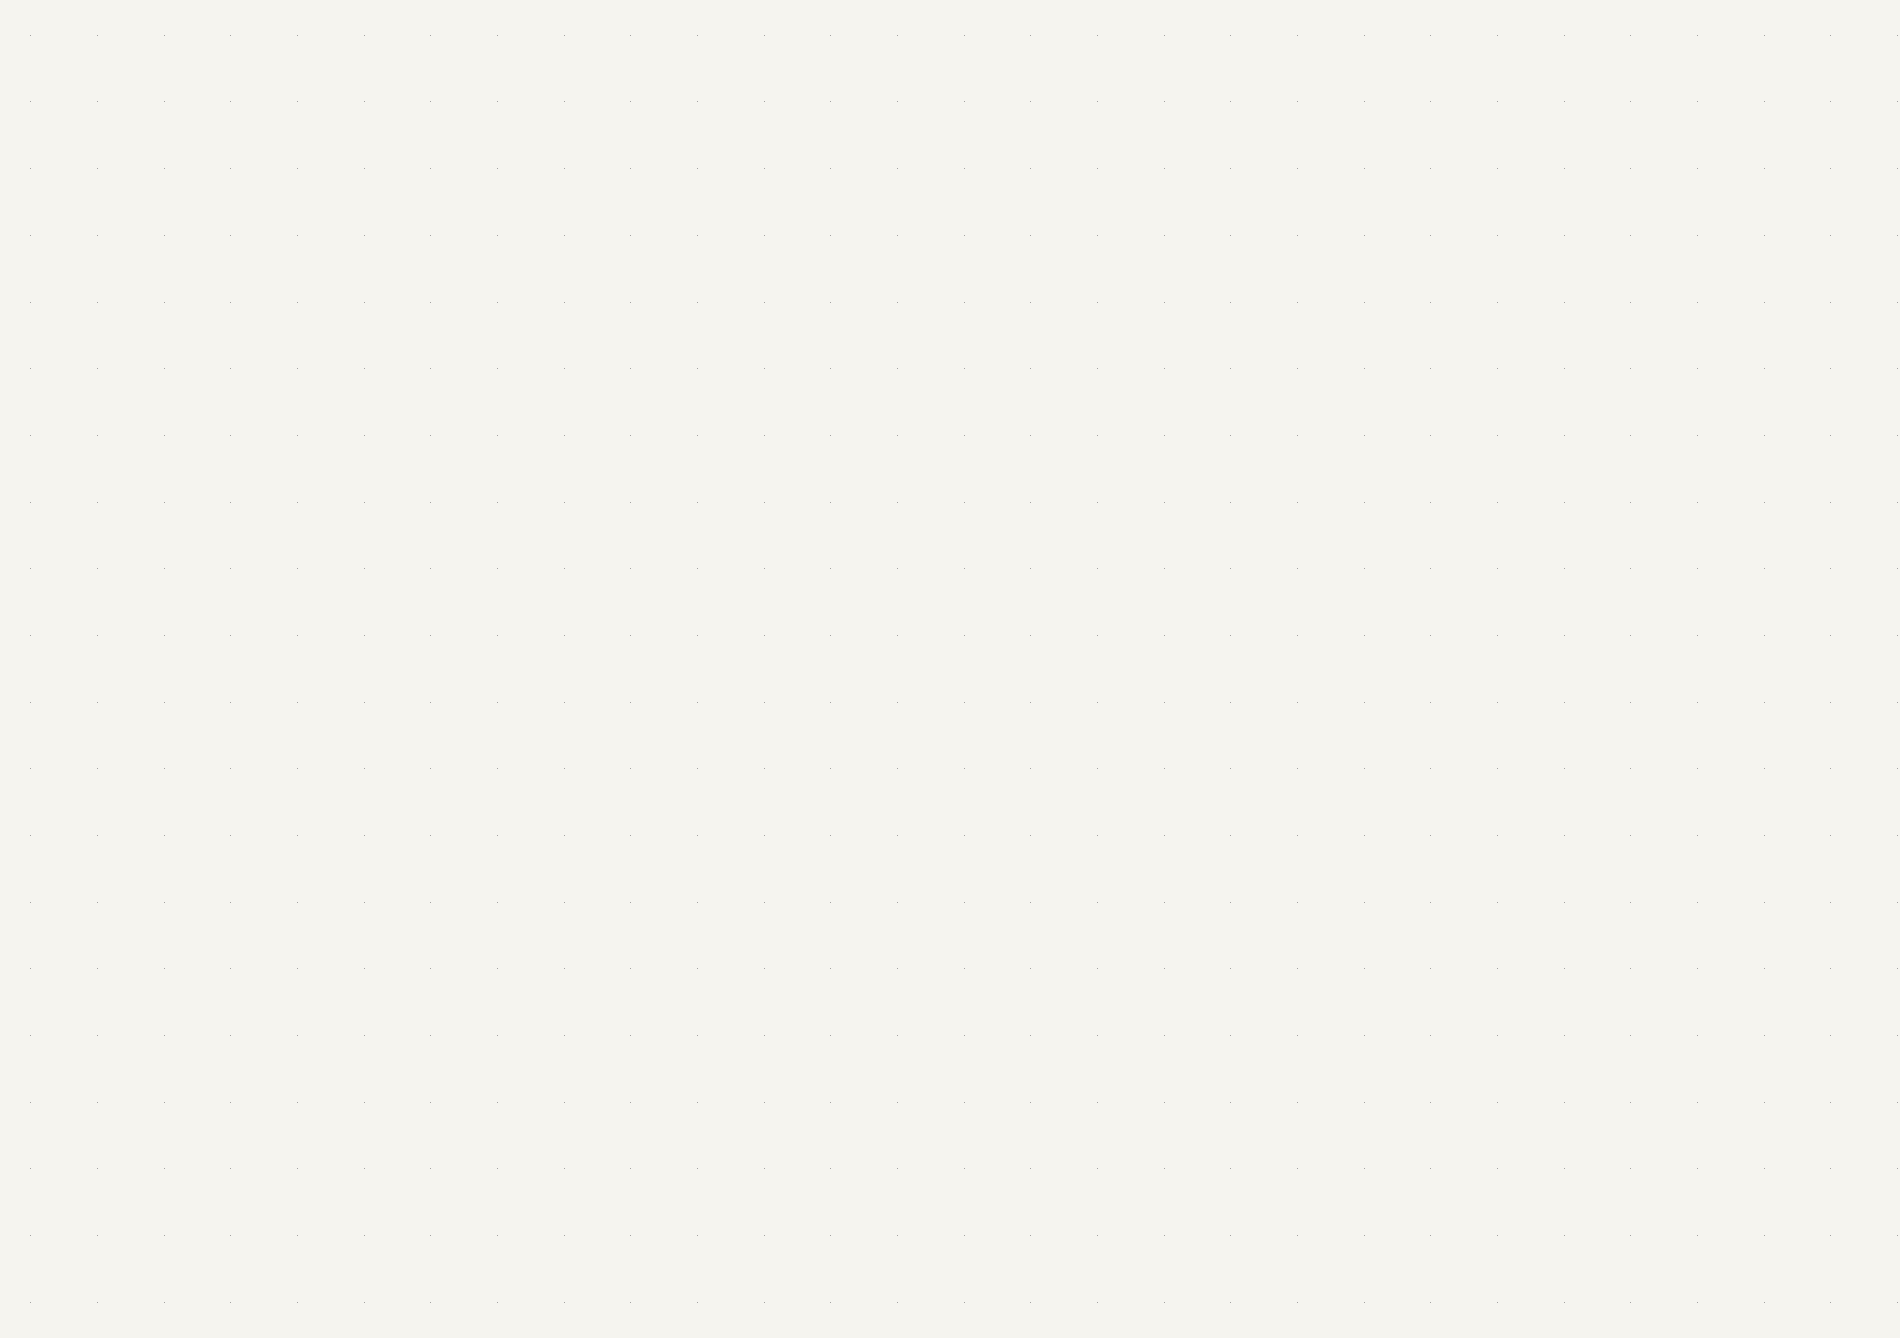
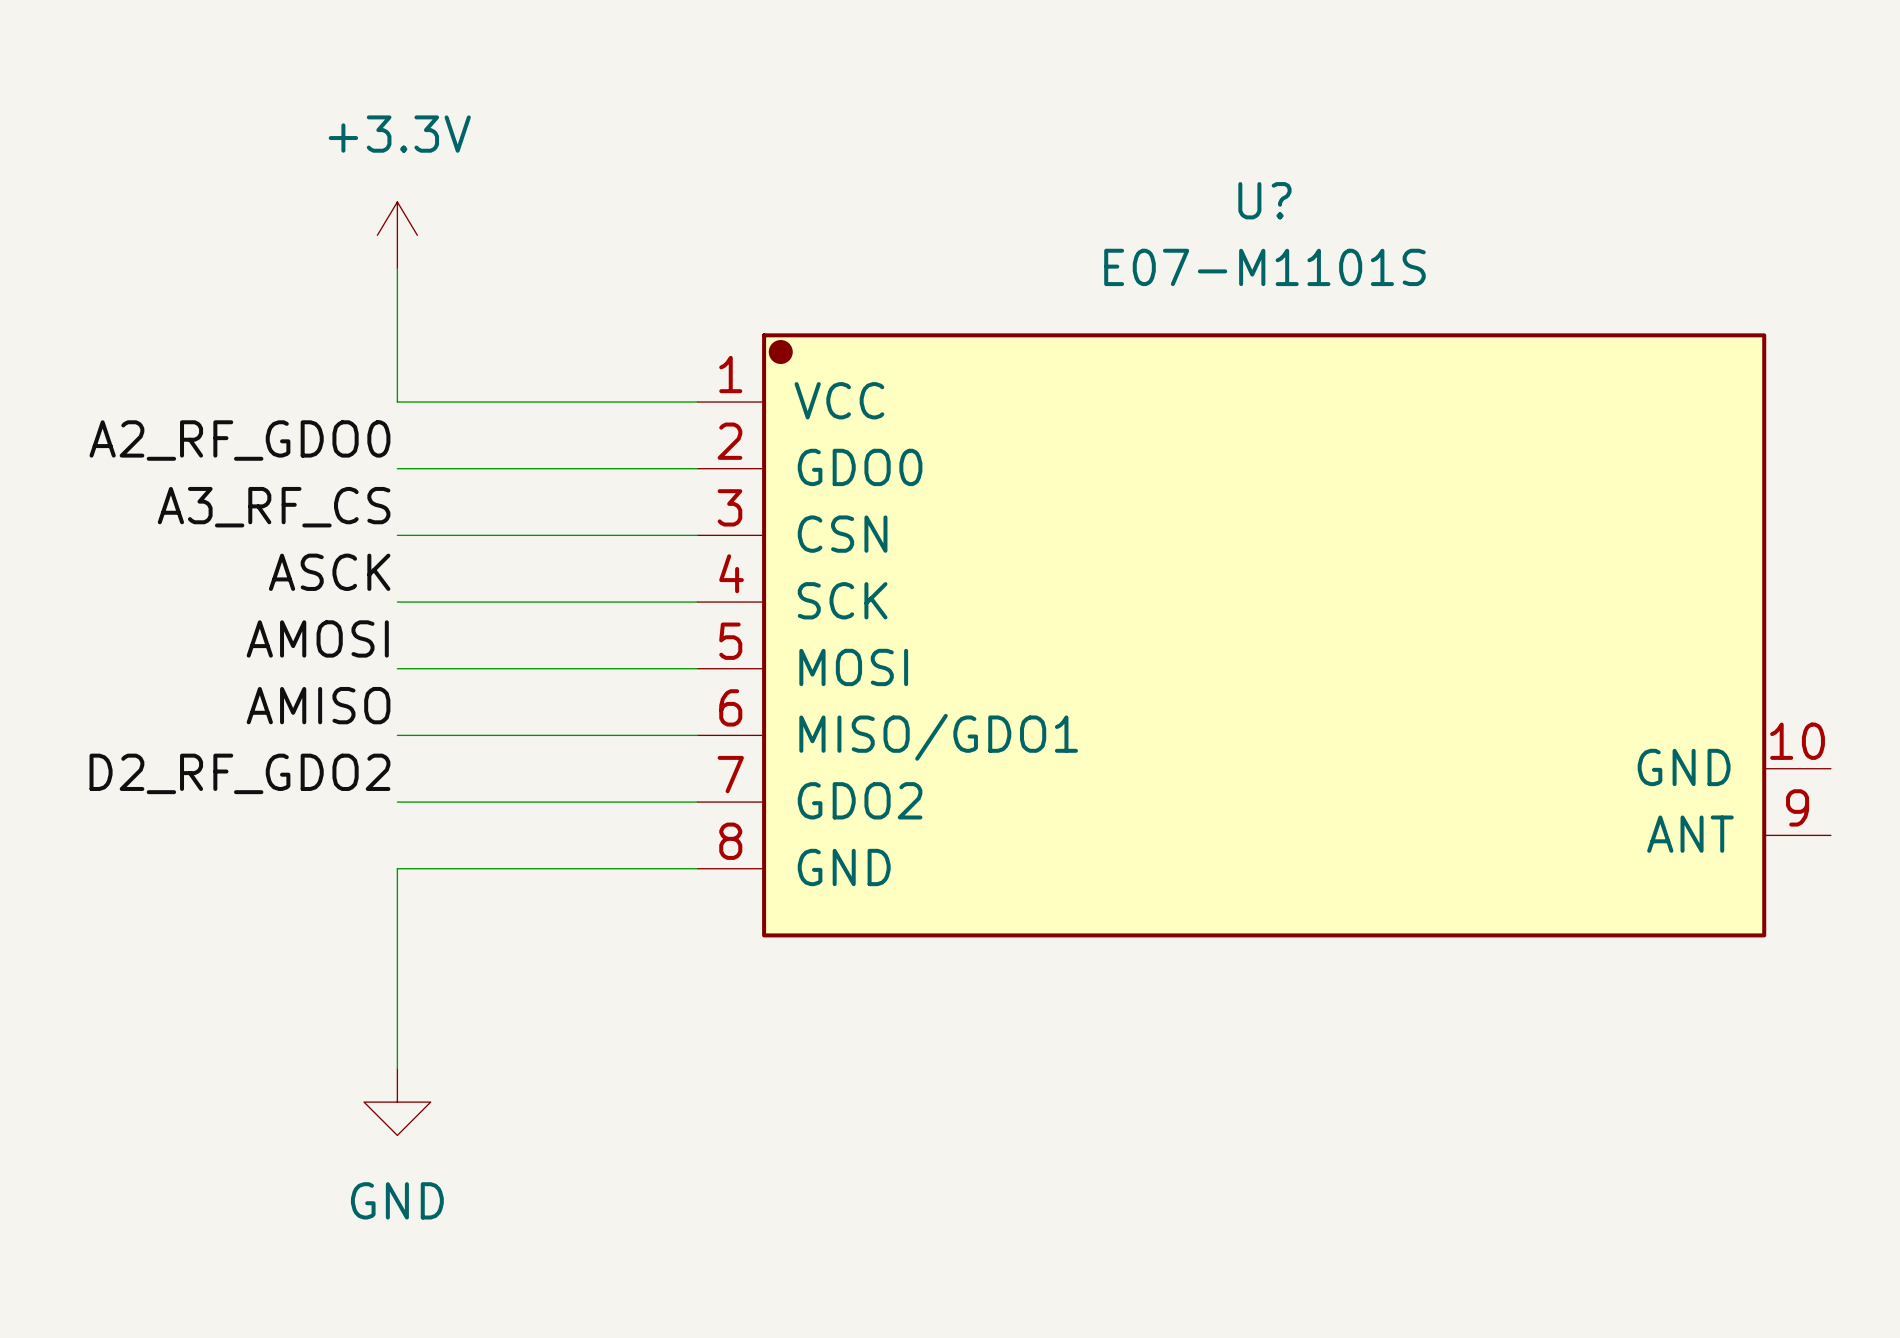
power symbol: none -> +3.3V (397, 235)
wire: none -> (397, 268) (397, 402) (697, 402)
label: none -> A2_RF_GDO0 (239, 440)
wire: none -> (397, 468) (697, 468)
label: none -> A3_RF_CS (274, 507)
wire: none -> (397, 535) (697, 535)
label: none -> ASCK (329, 572)
wire: none -> (397, 602) (697, 602)
U?: none -> E07-M1101S (1264, 635)
label: none -> AMOSI (317, 638)
wire: none -> (397, 668) (697, 668)
label: none -> AMISO (318, 705)
wire: none -> (397, 735) (697, 735)
label: none -> D2_RF_GDO2 (239, 773)
wire: none -> (397, 802) (697, 802)
wire: none -> (697, 868) (397, 868) (397, 1068)
power symbol: none -> GND (397, 1102)

